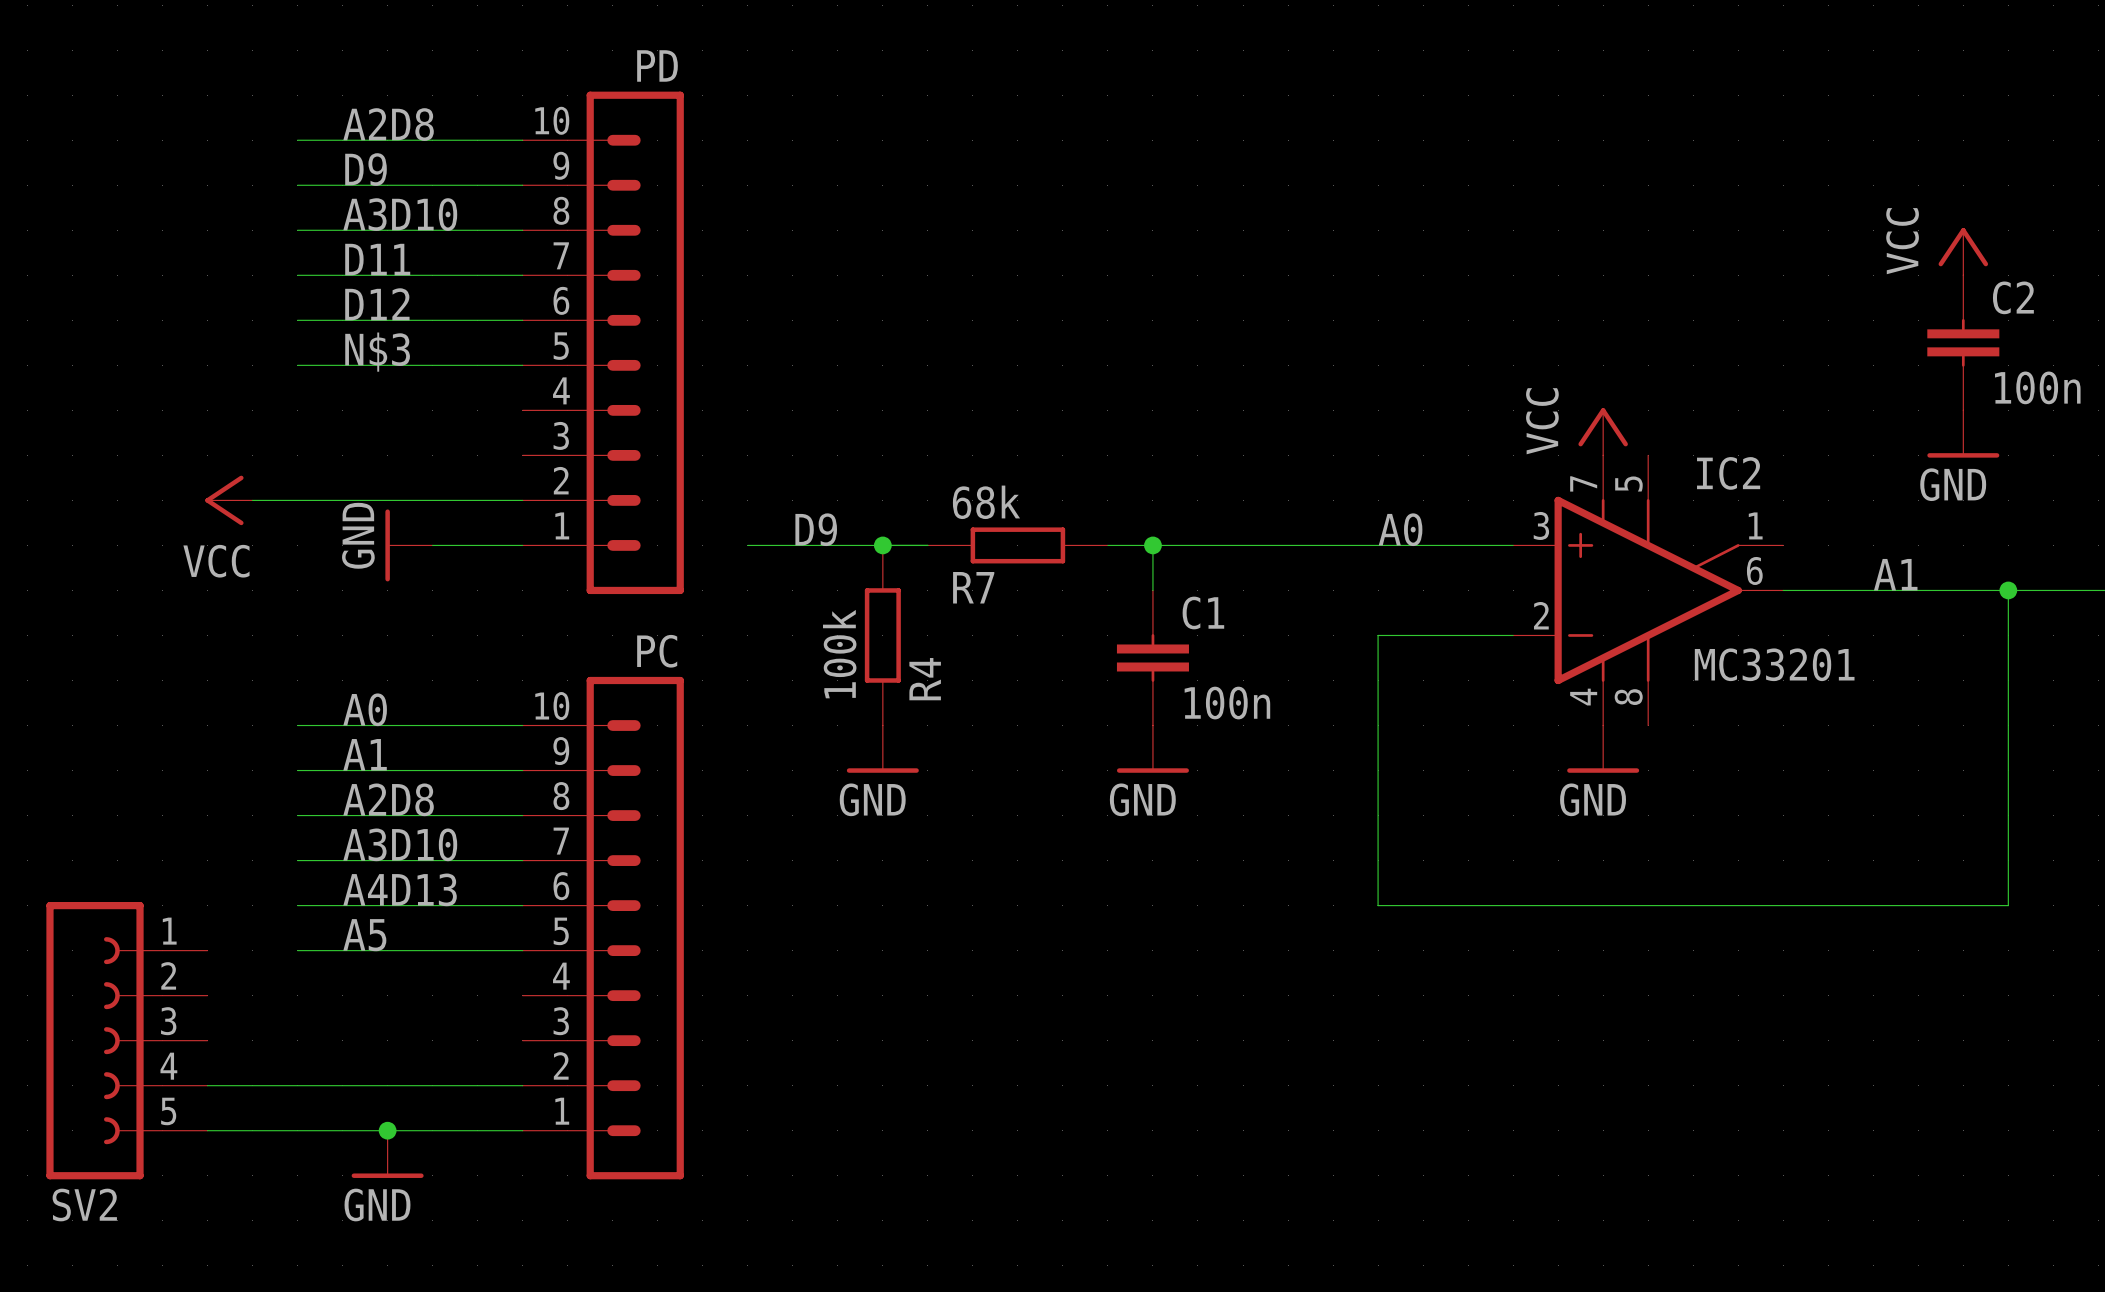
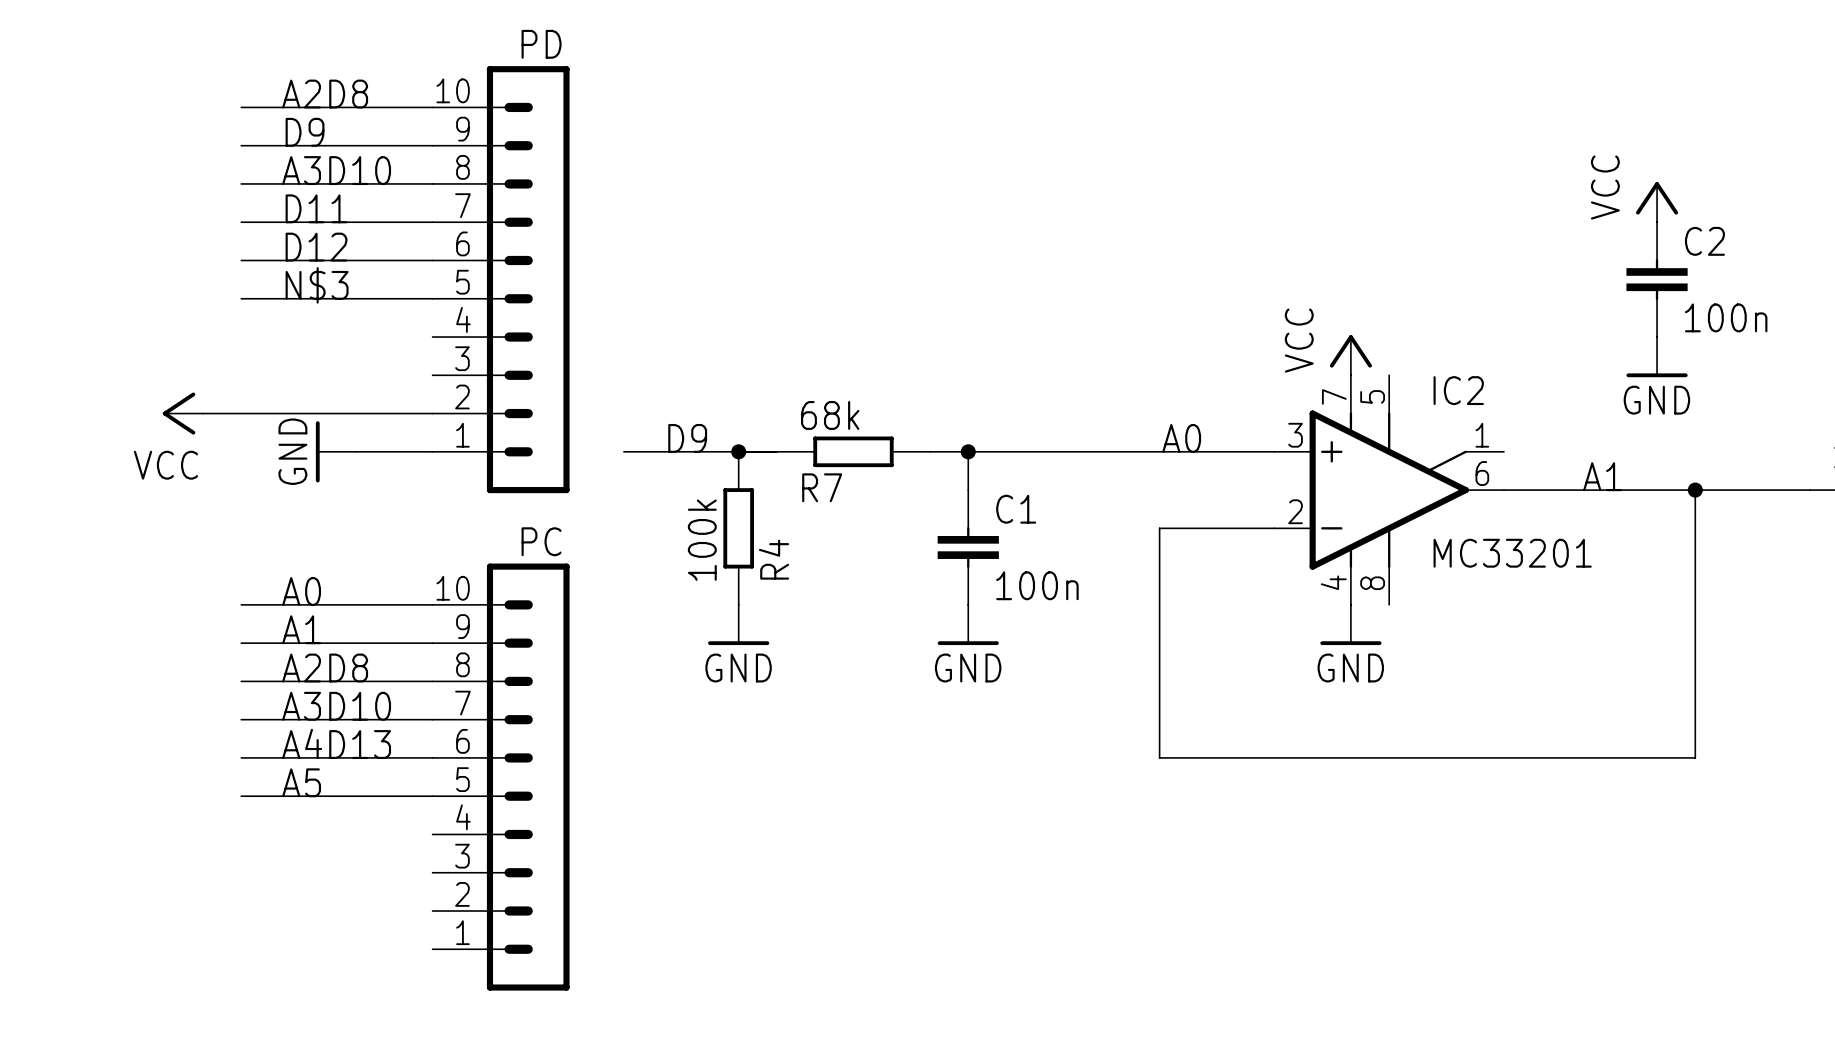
SV2: (126, 1040) -> none
wire: (207, 1085) (522, 1085) -> none
wire: (207, 1130) (522, 1130) -> none
junction: (387, 1130) -> none
power symbol: GND (387, 1154) -> none

